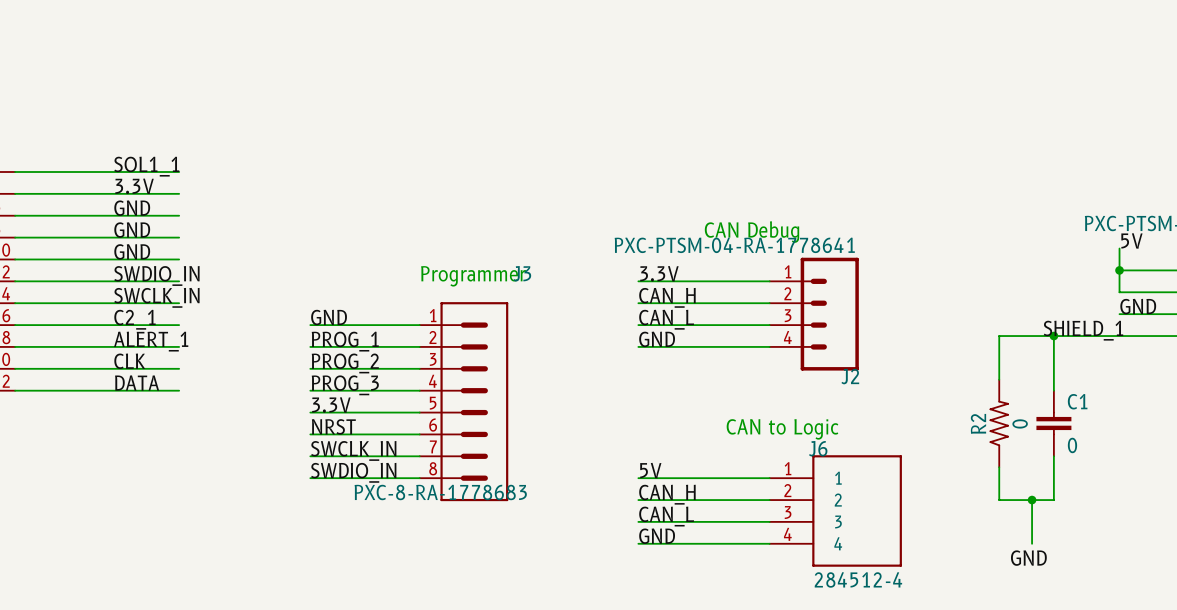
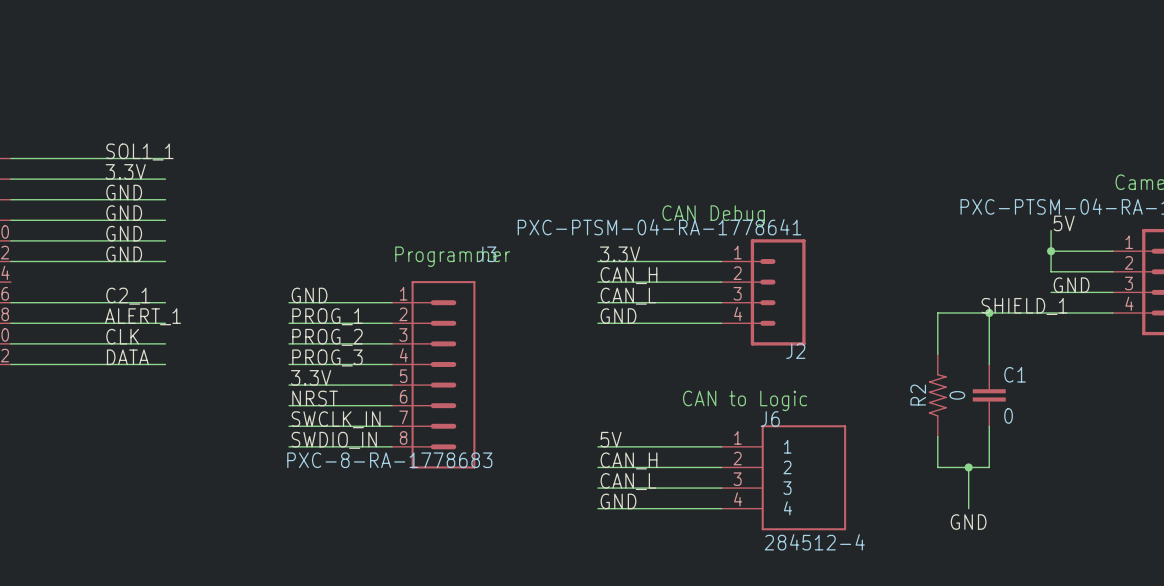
label: SWDIO_IN (156, 275) -> GND (124, 254)
label: SWCLK_IN (156, 297) -> none
wire: (15, 303) (179, 303) -> none

